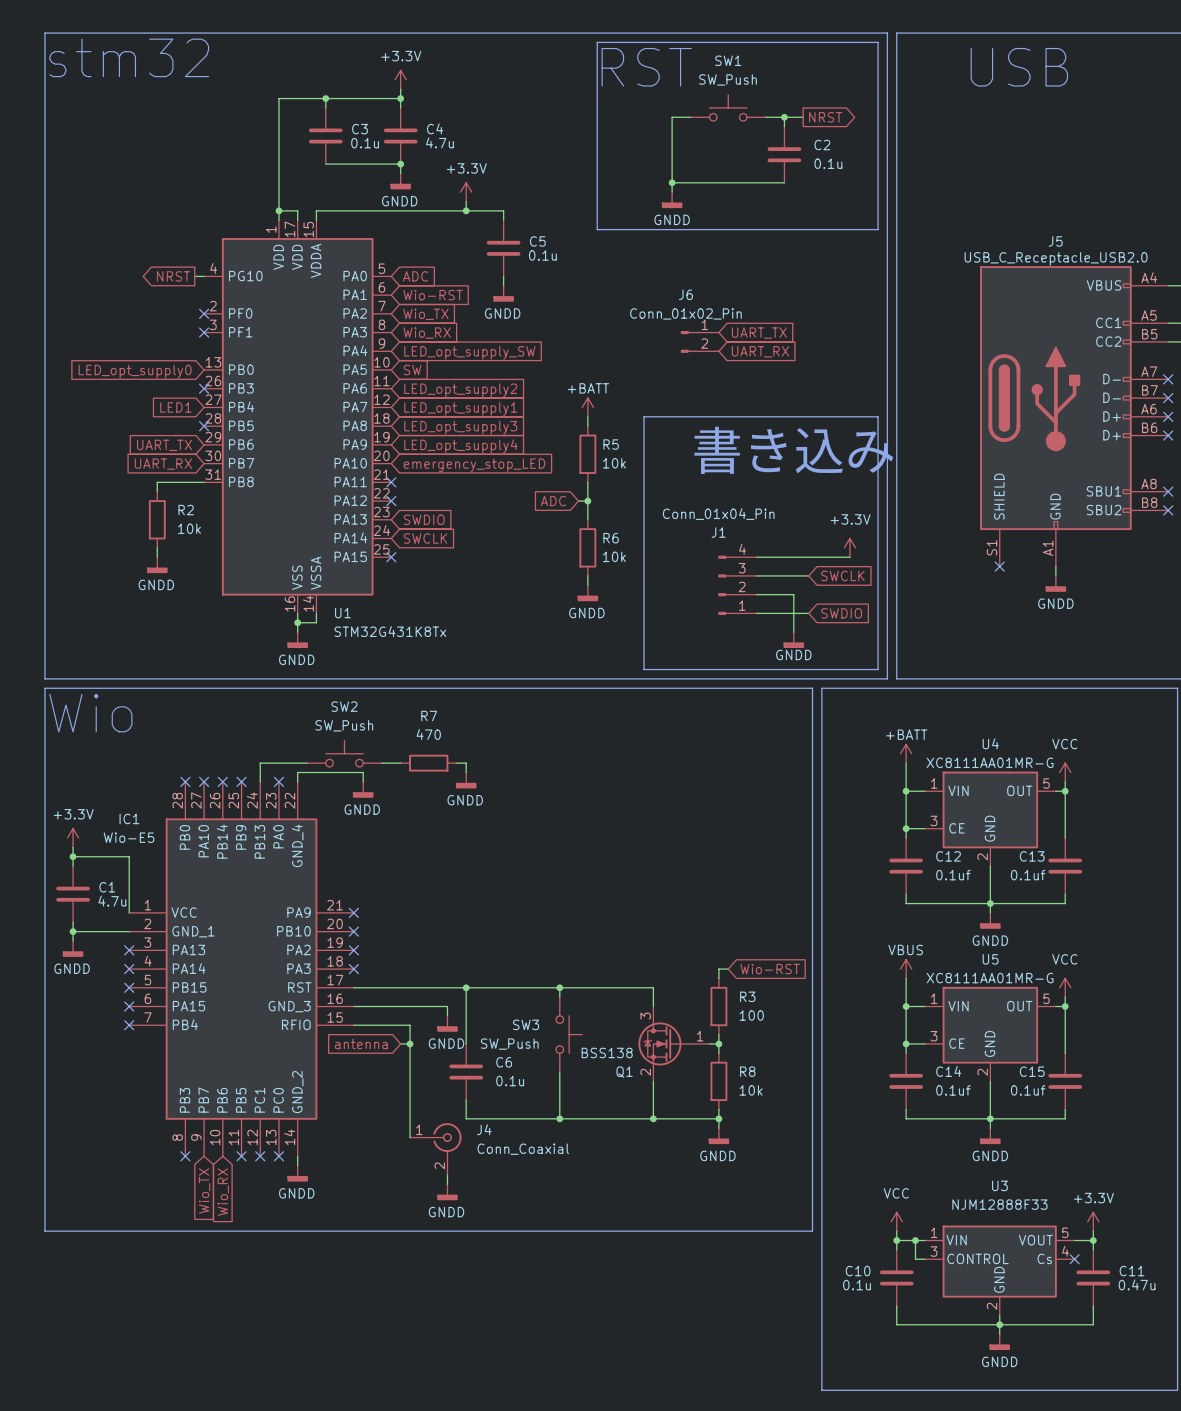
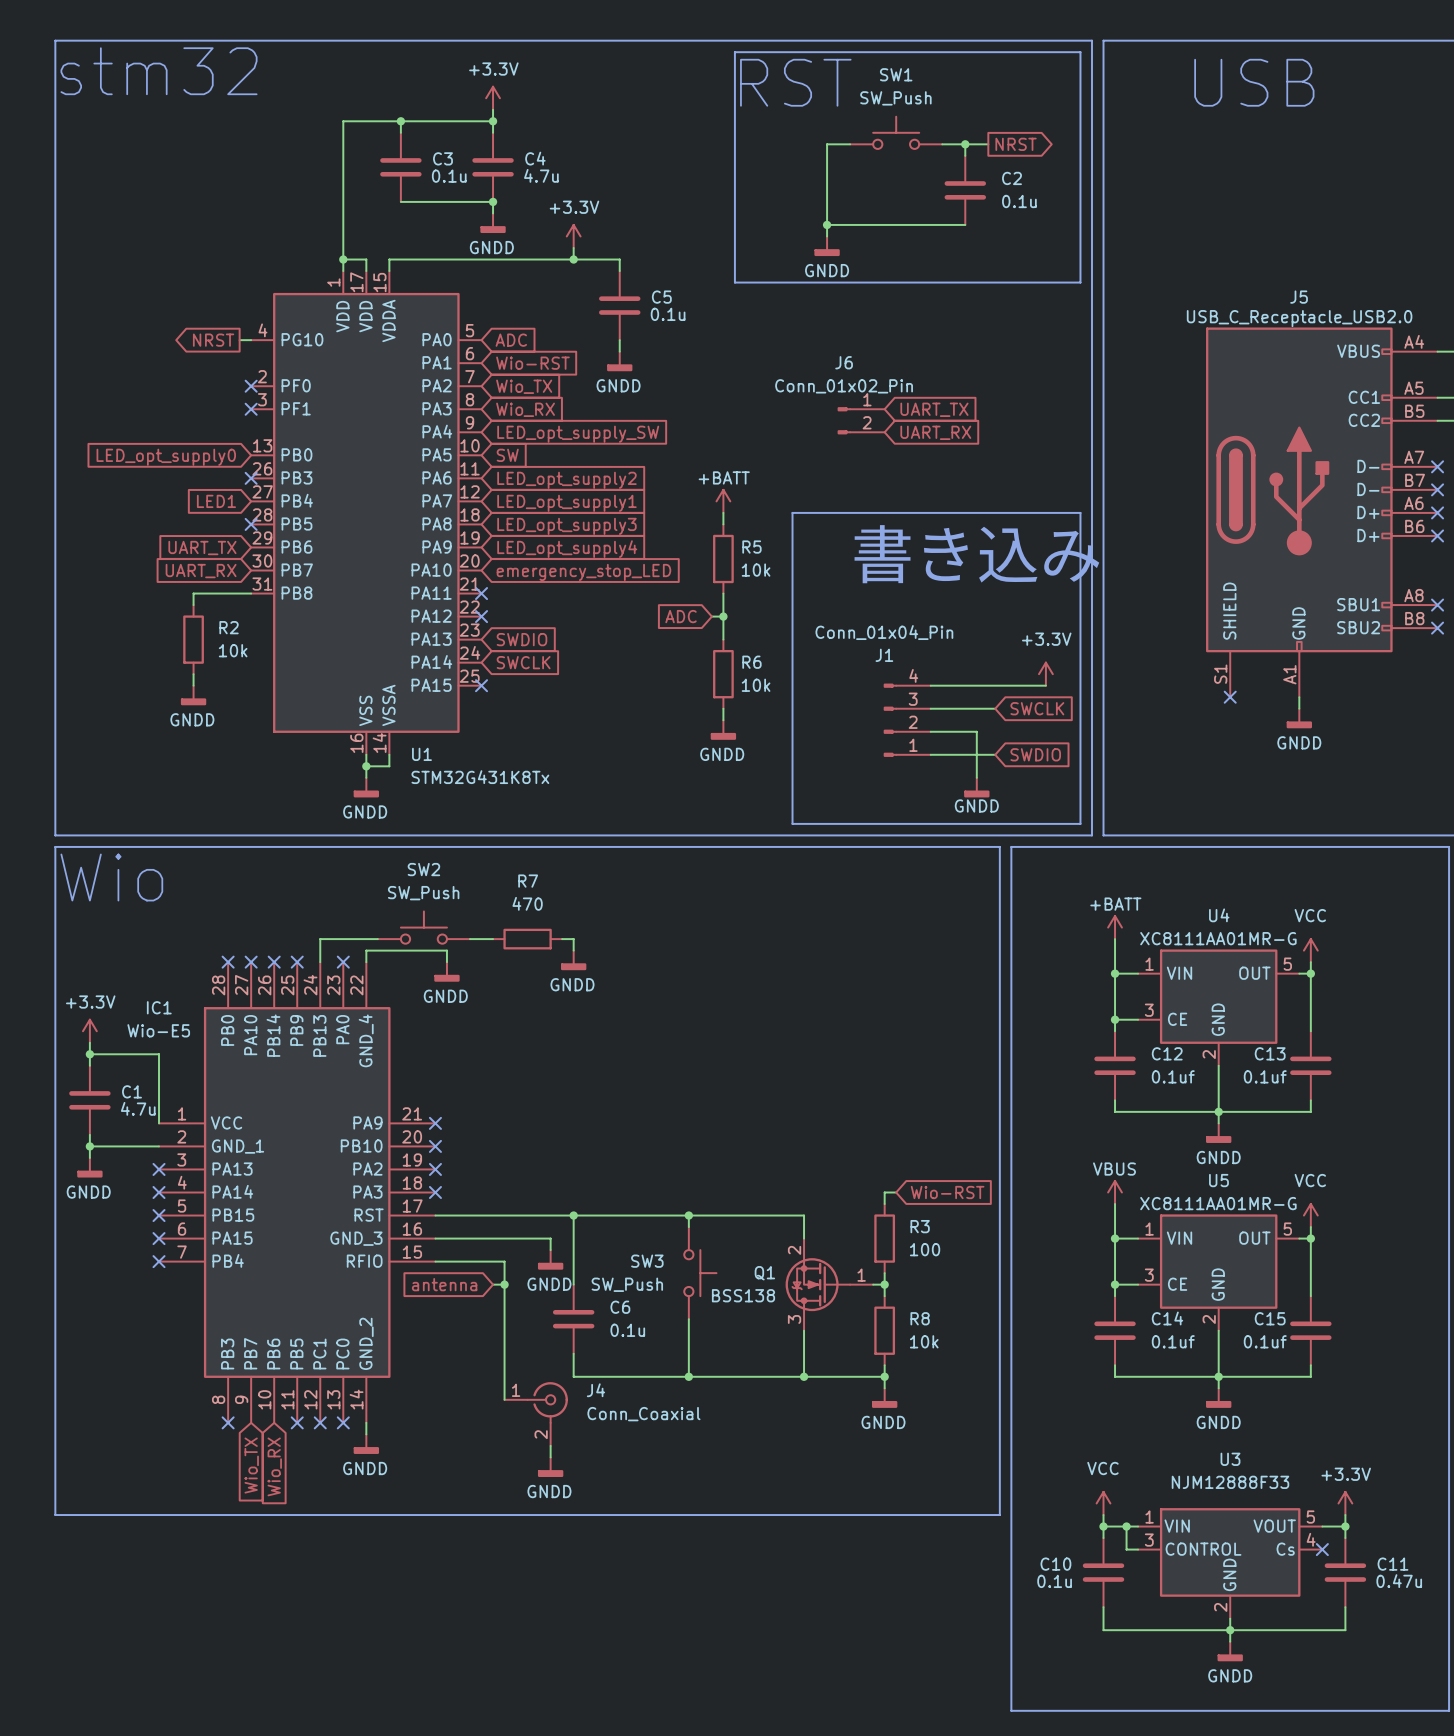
Q1 flip: as is (664, 1043) -> up-down (817, 1284)
Q1 name position: Q1 (624, 1072) -> Q1 (764, 1273)

